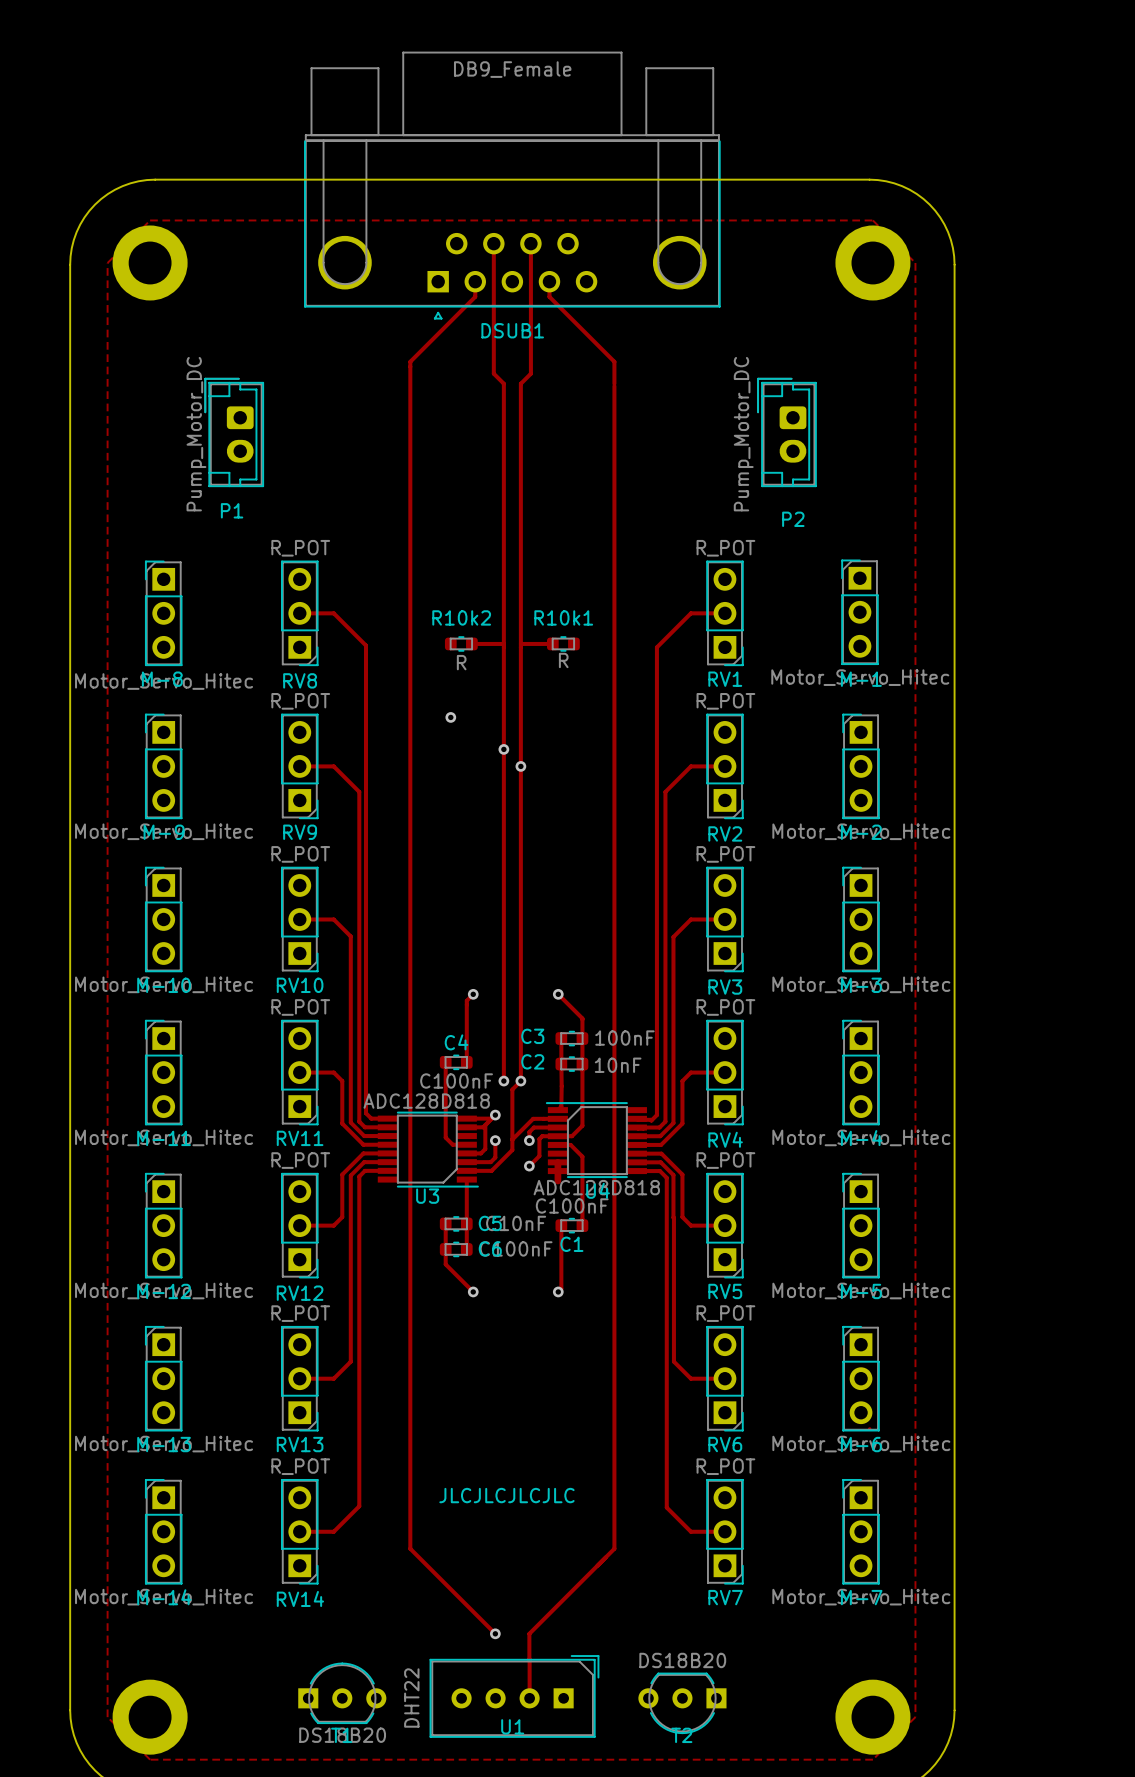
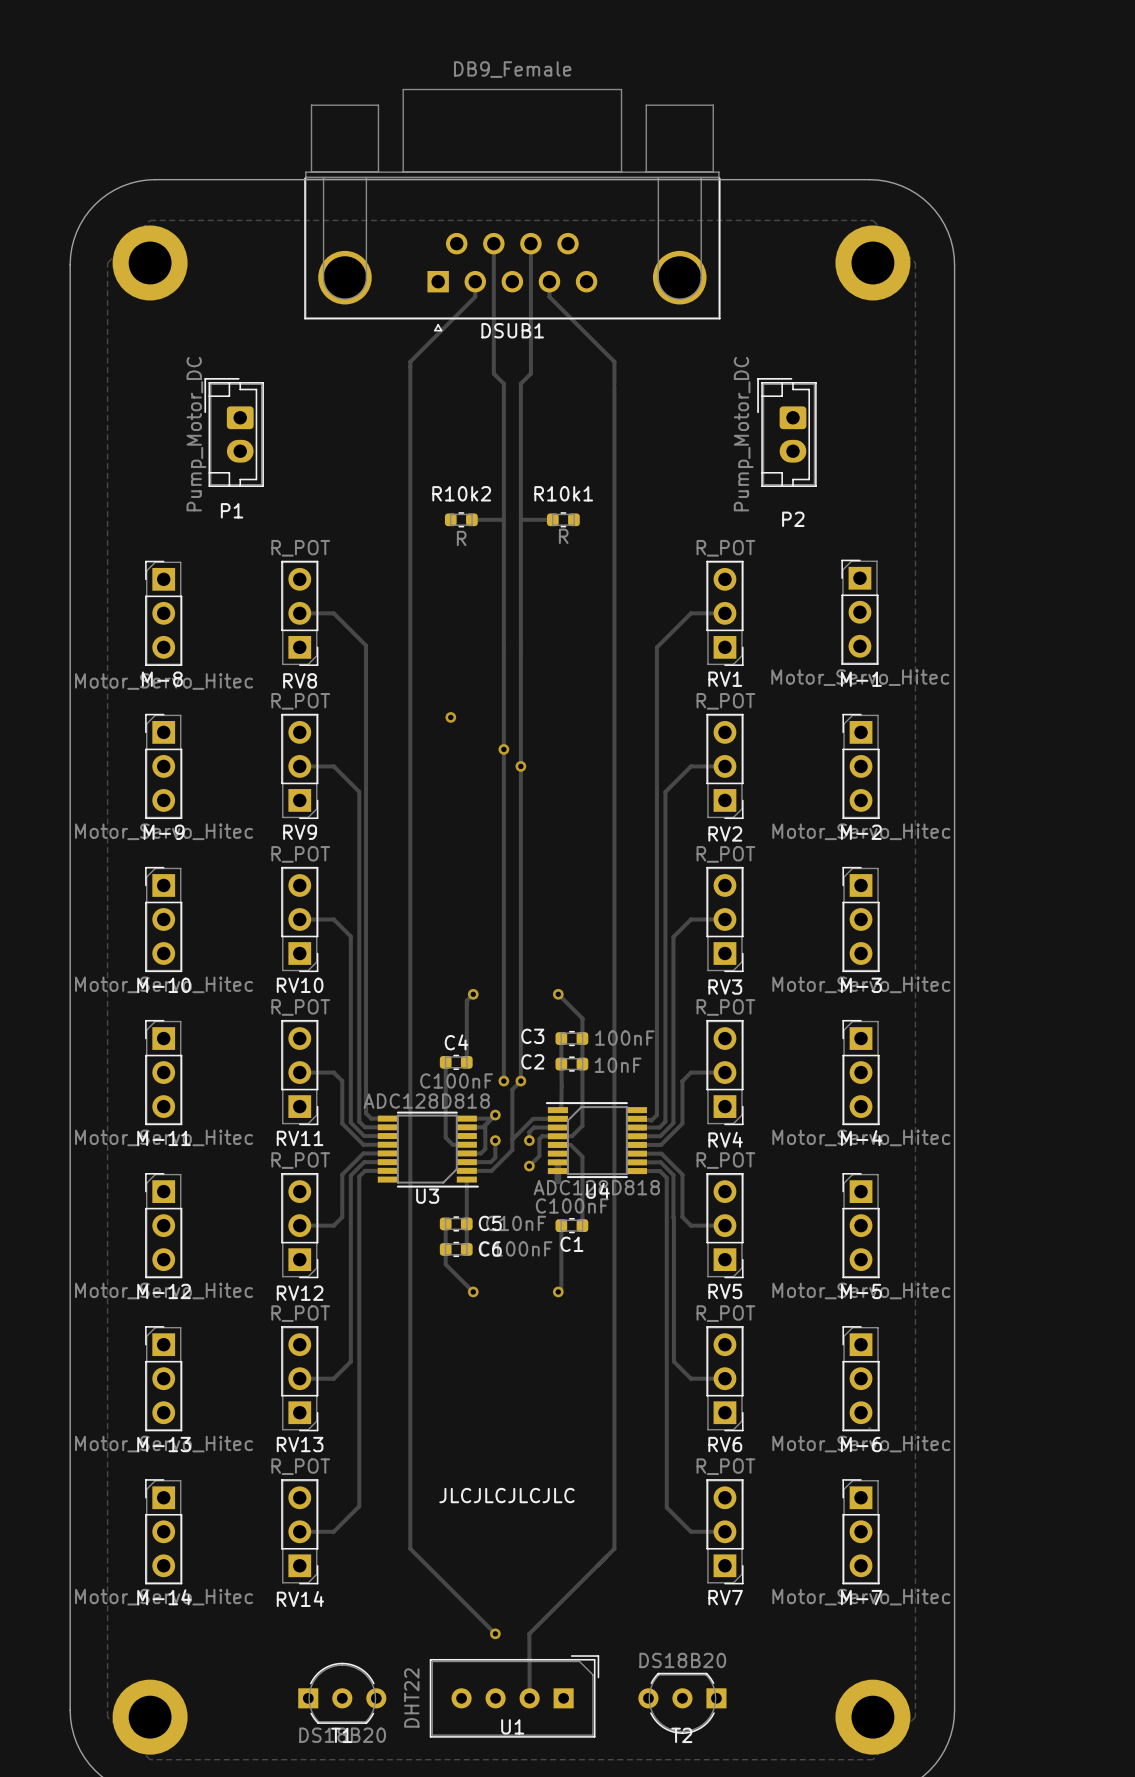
DSUB1 footprint: [304, 51, 721, 320] -> [304, 88, 721, 332]
R10k2 position: (461, 643) -> (461, 519)
track: (471, 643) (503, 643) -> (471, 519) (503, 519)
track: (520, 643) (552, 643) -> (520, 519) (552, 519)
R10k1 position: (563, 643) -> (563, 519)

